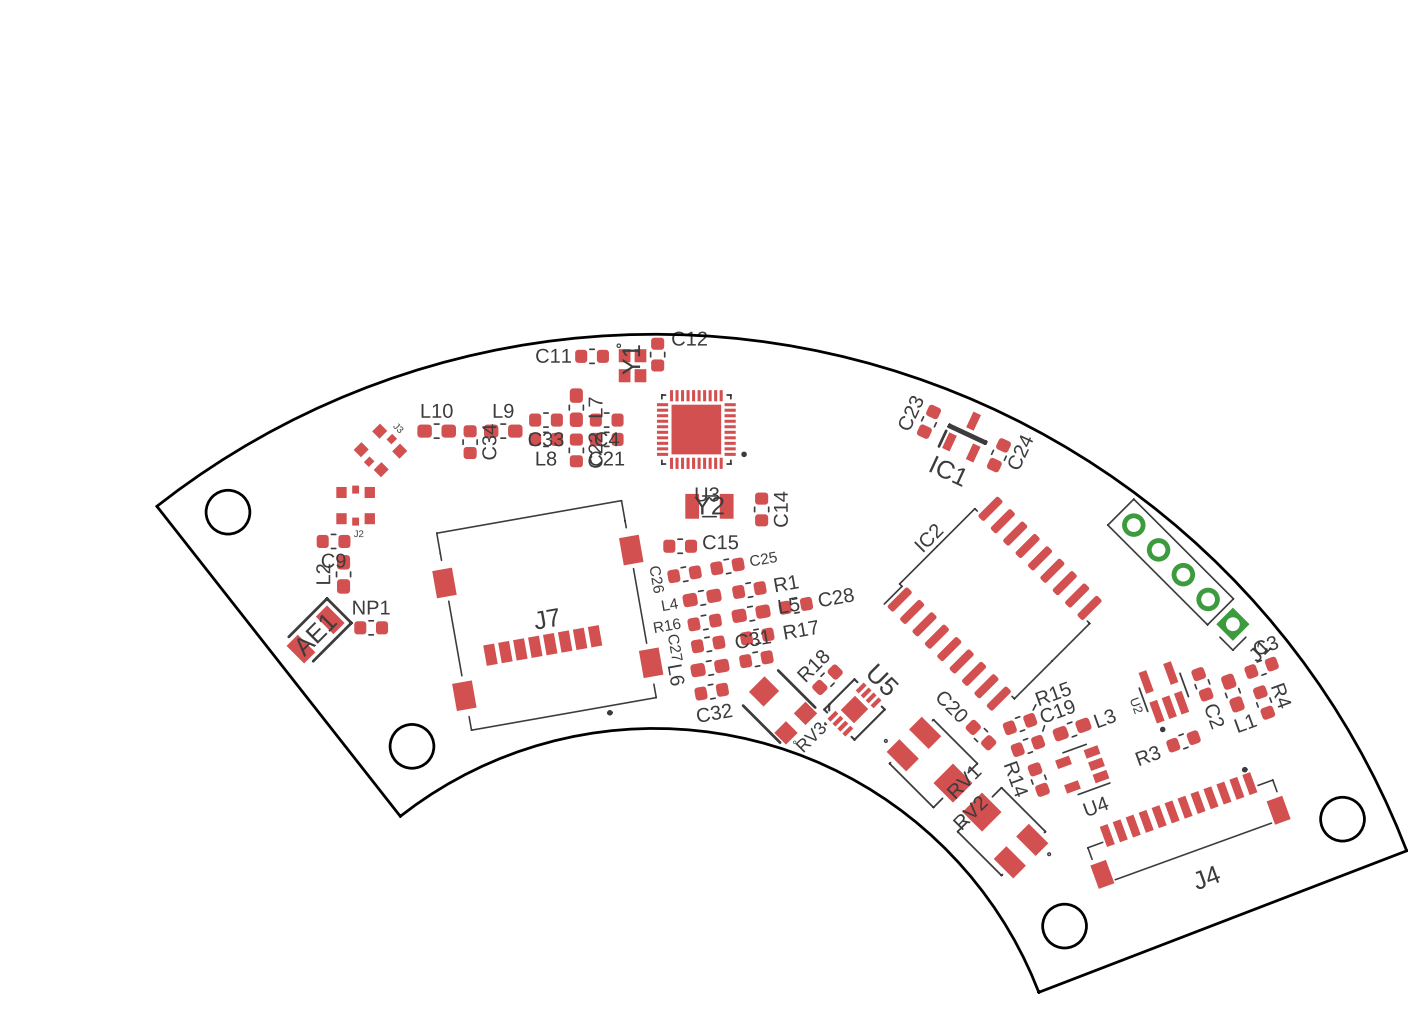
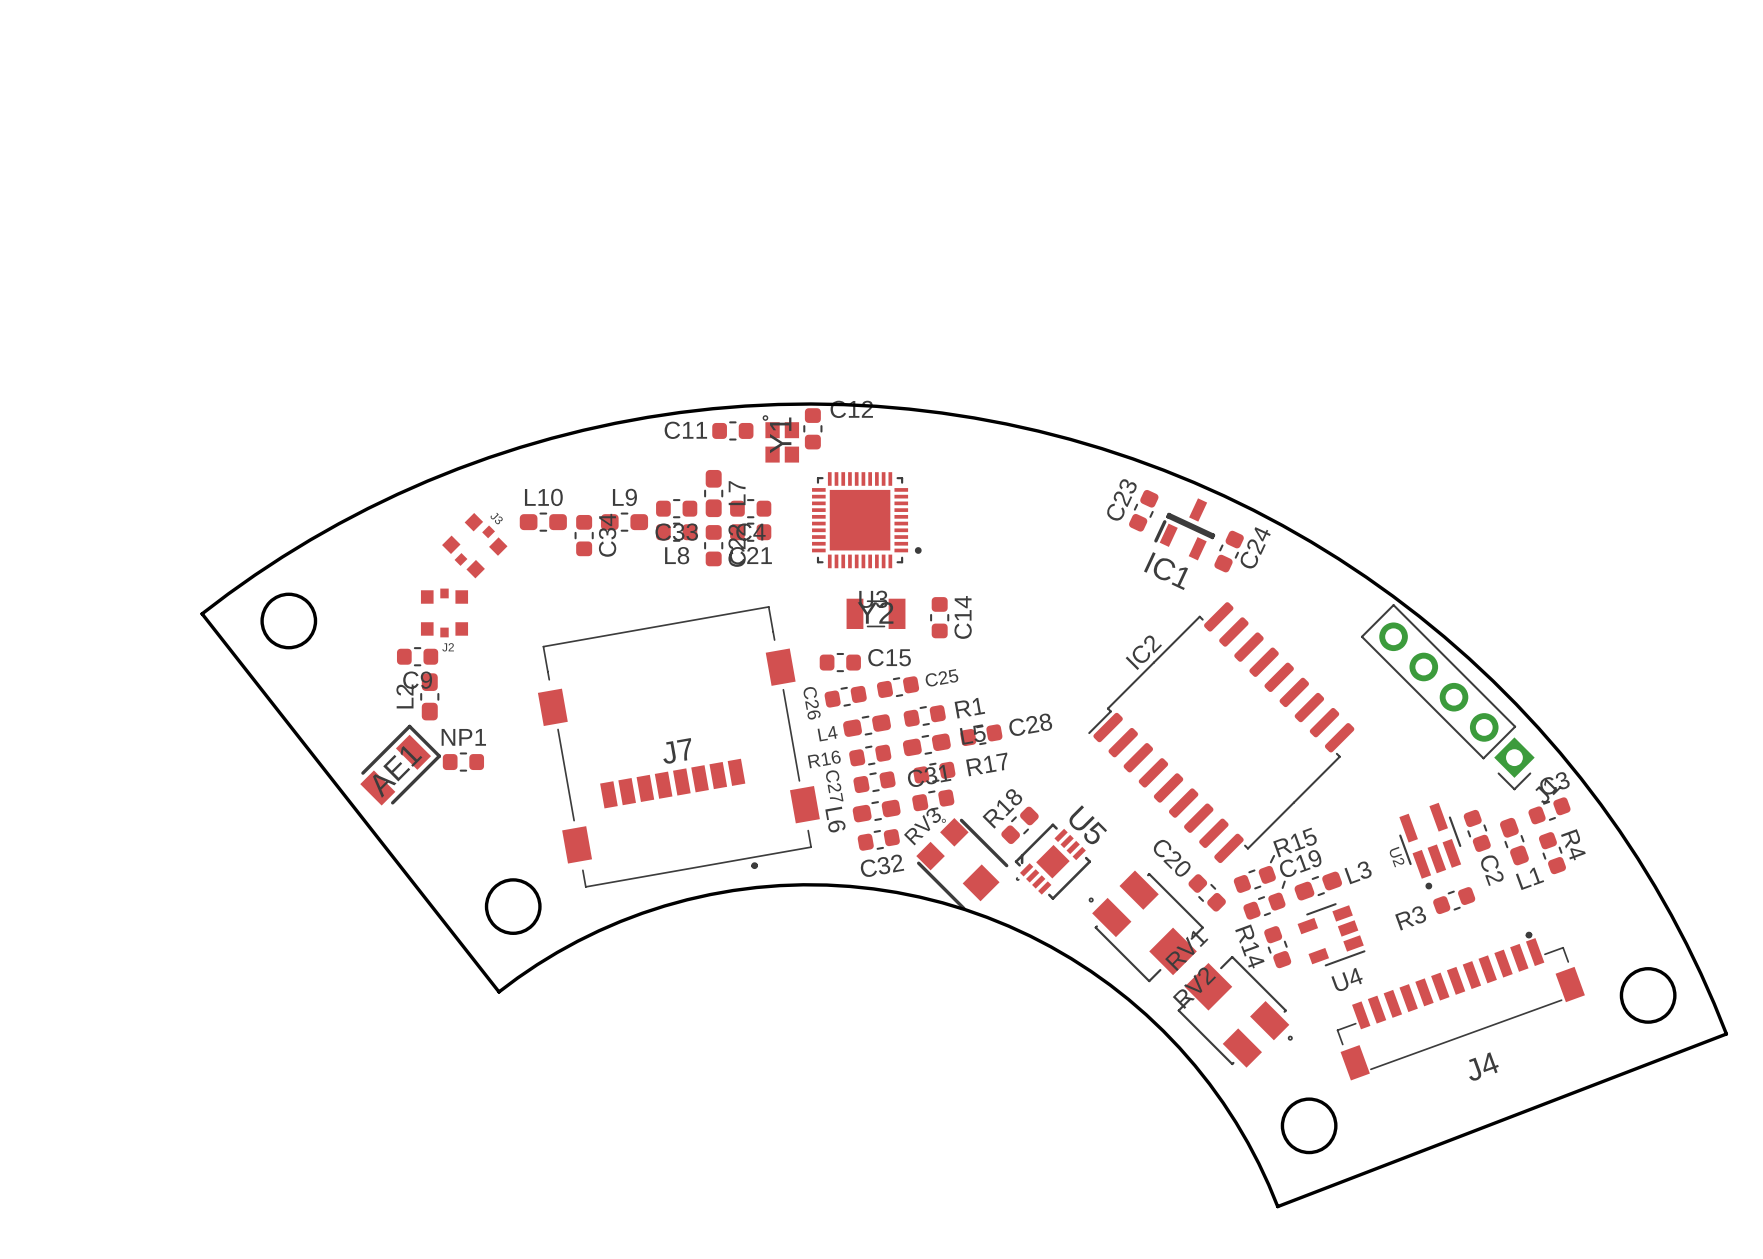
RV3 rotation: 0° (779, 706) -> 180° (962, 864)

